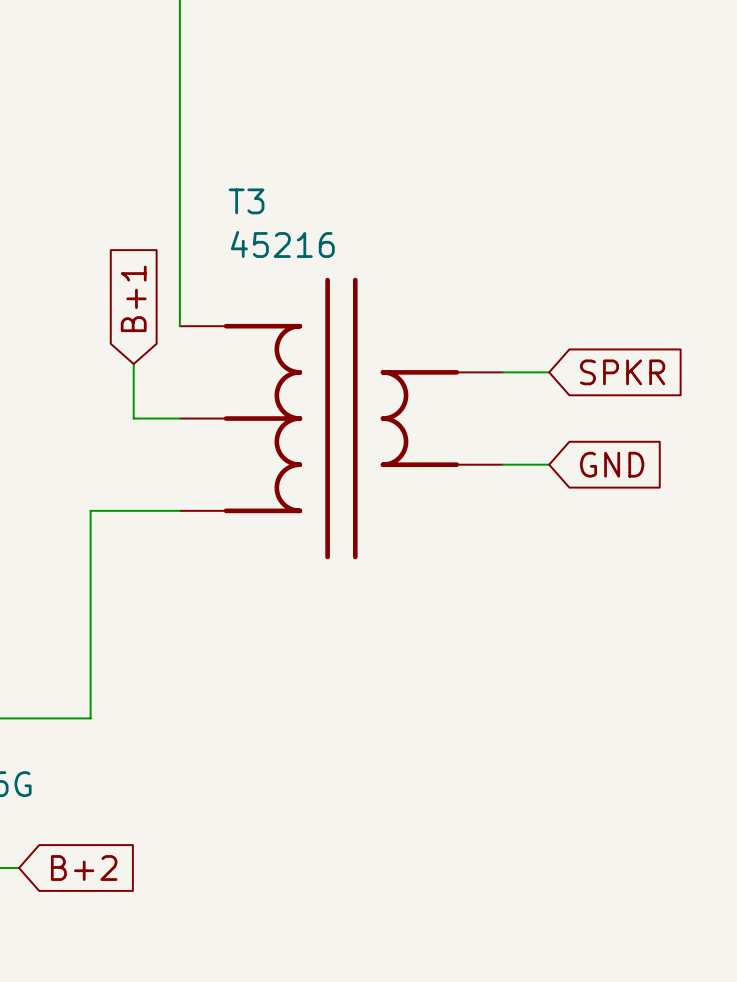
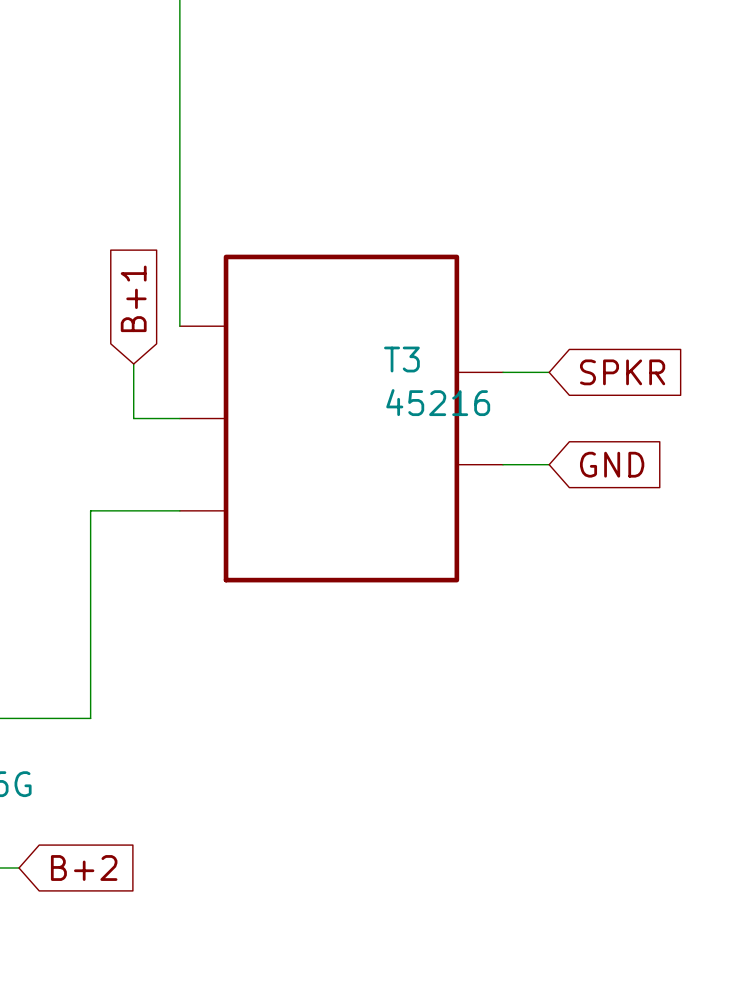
T3 name position: T3 (246, 201) -> T3 (401, 359)
T3 value position: 45216 (282, 244) -> 45216 (438, 402)
T3 symbol: [179, 277, 504, 560] -> [179, 254, 504, 583]

